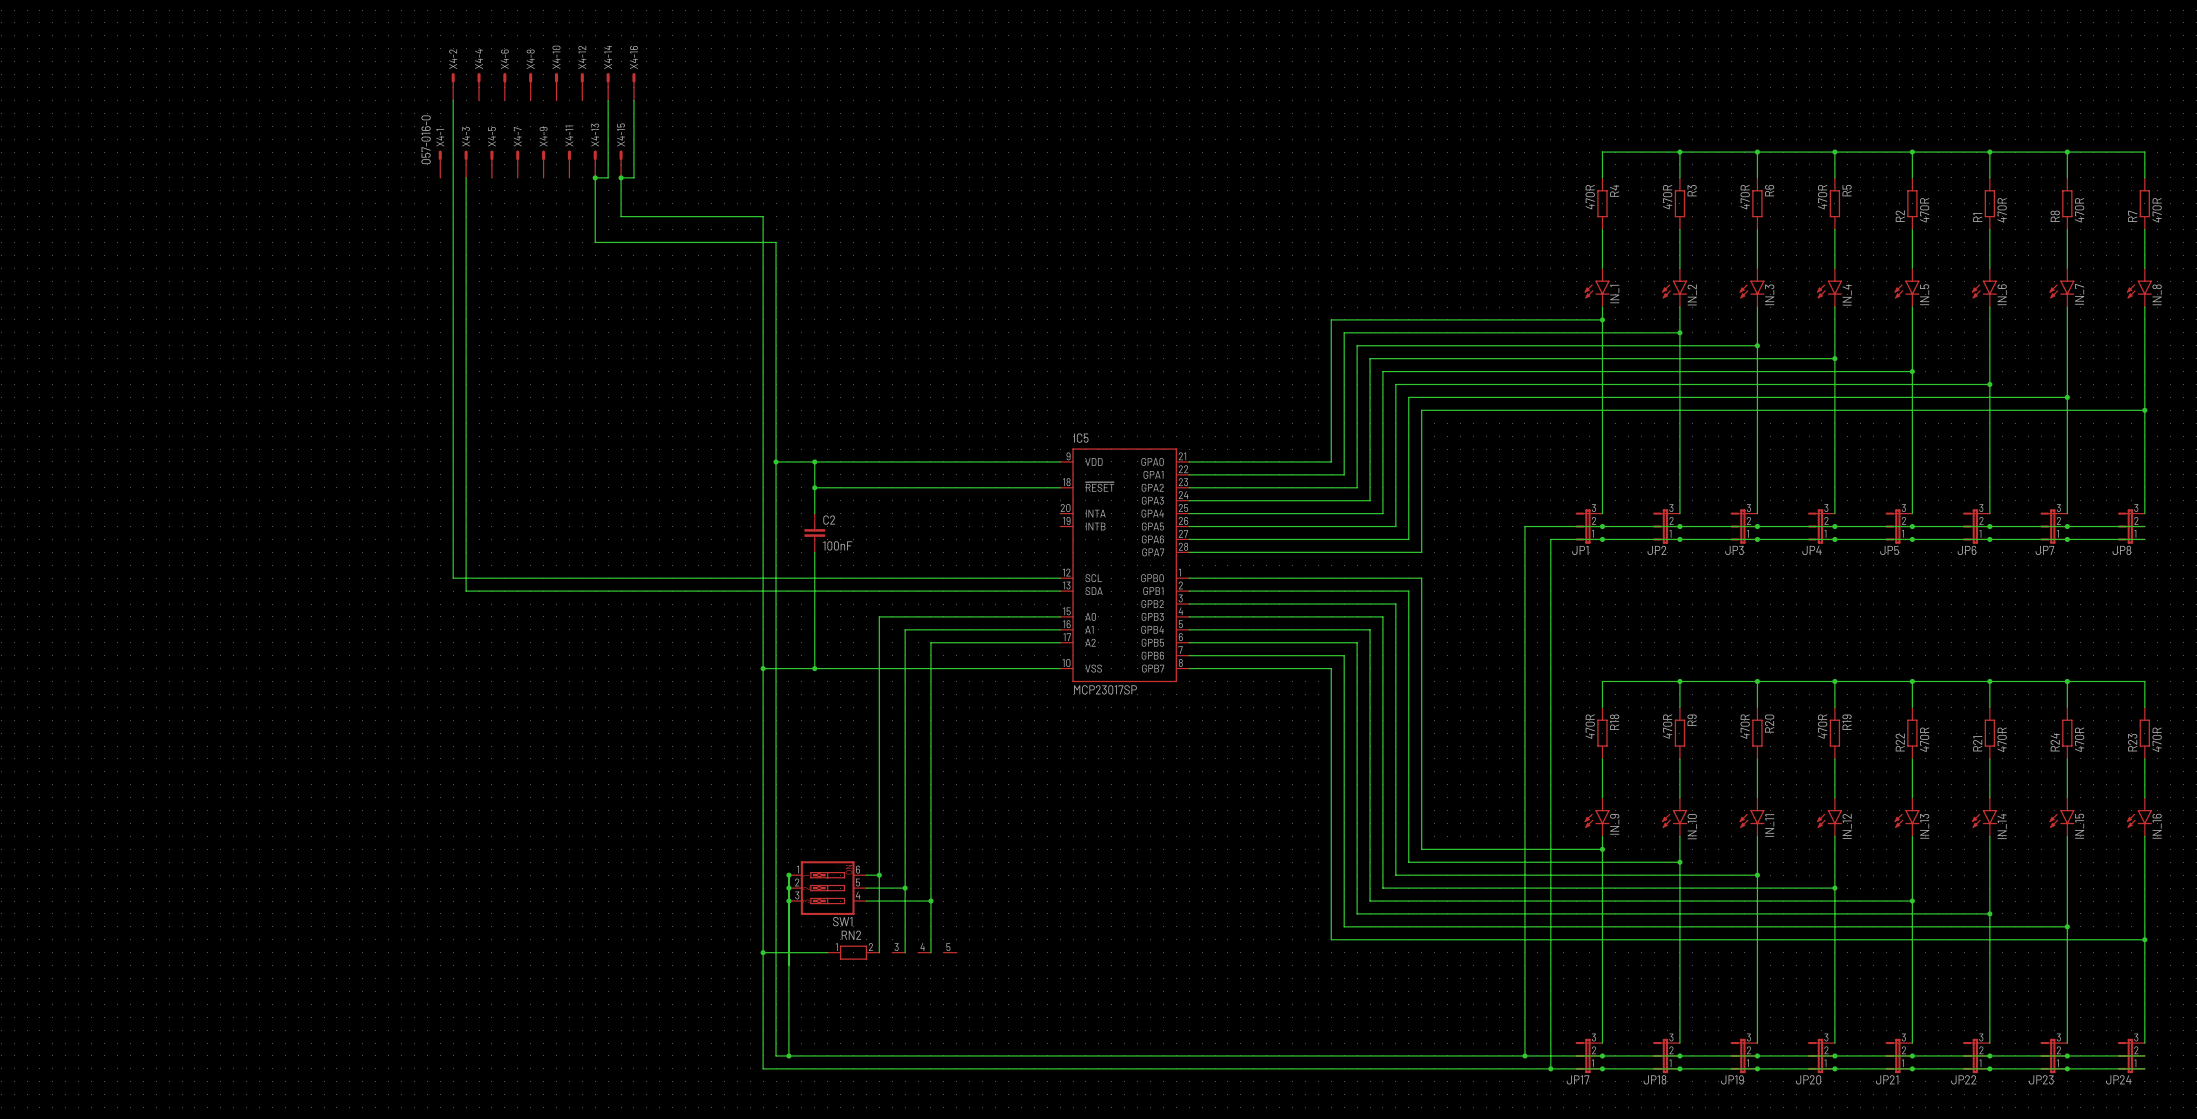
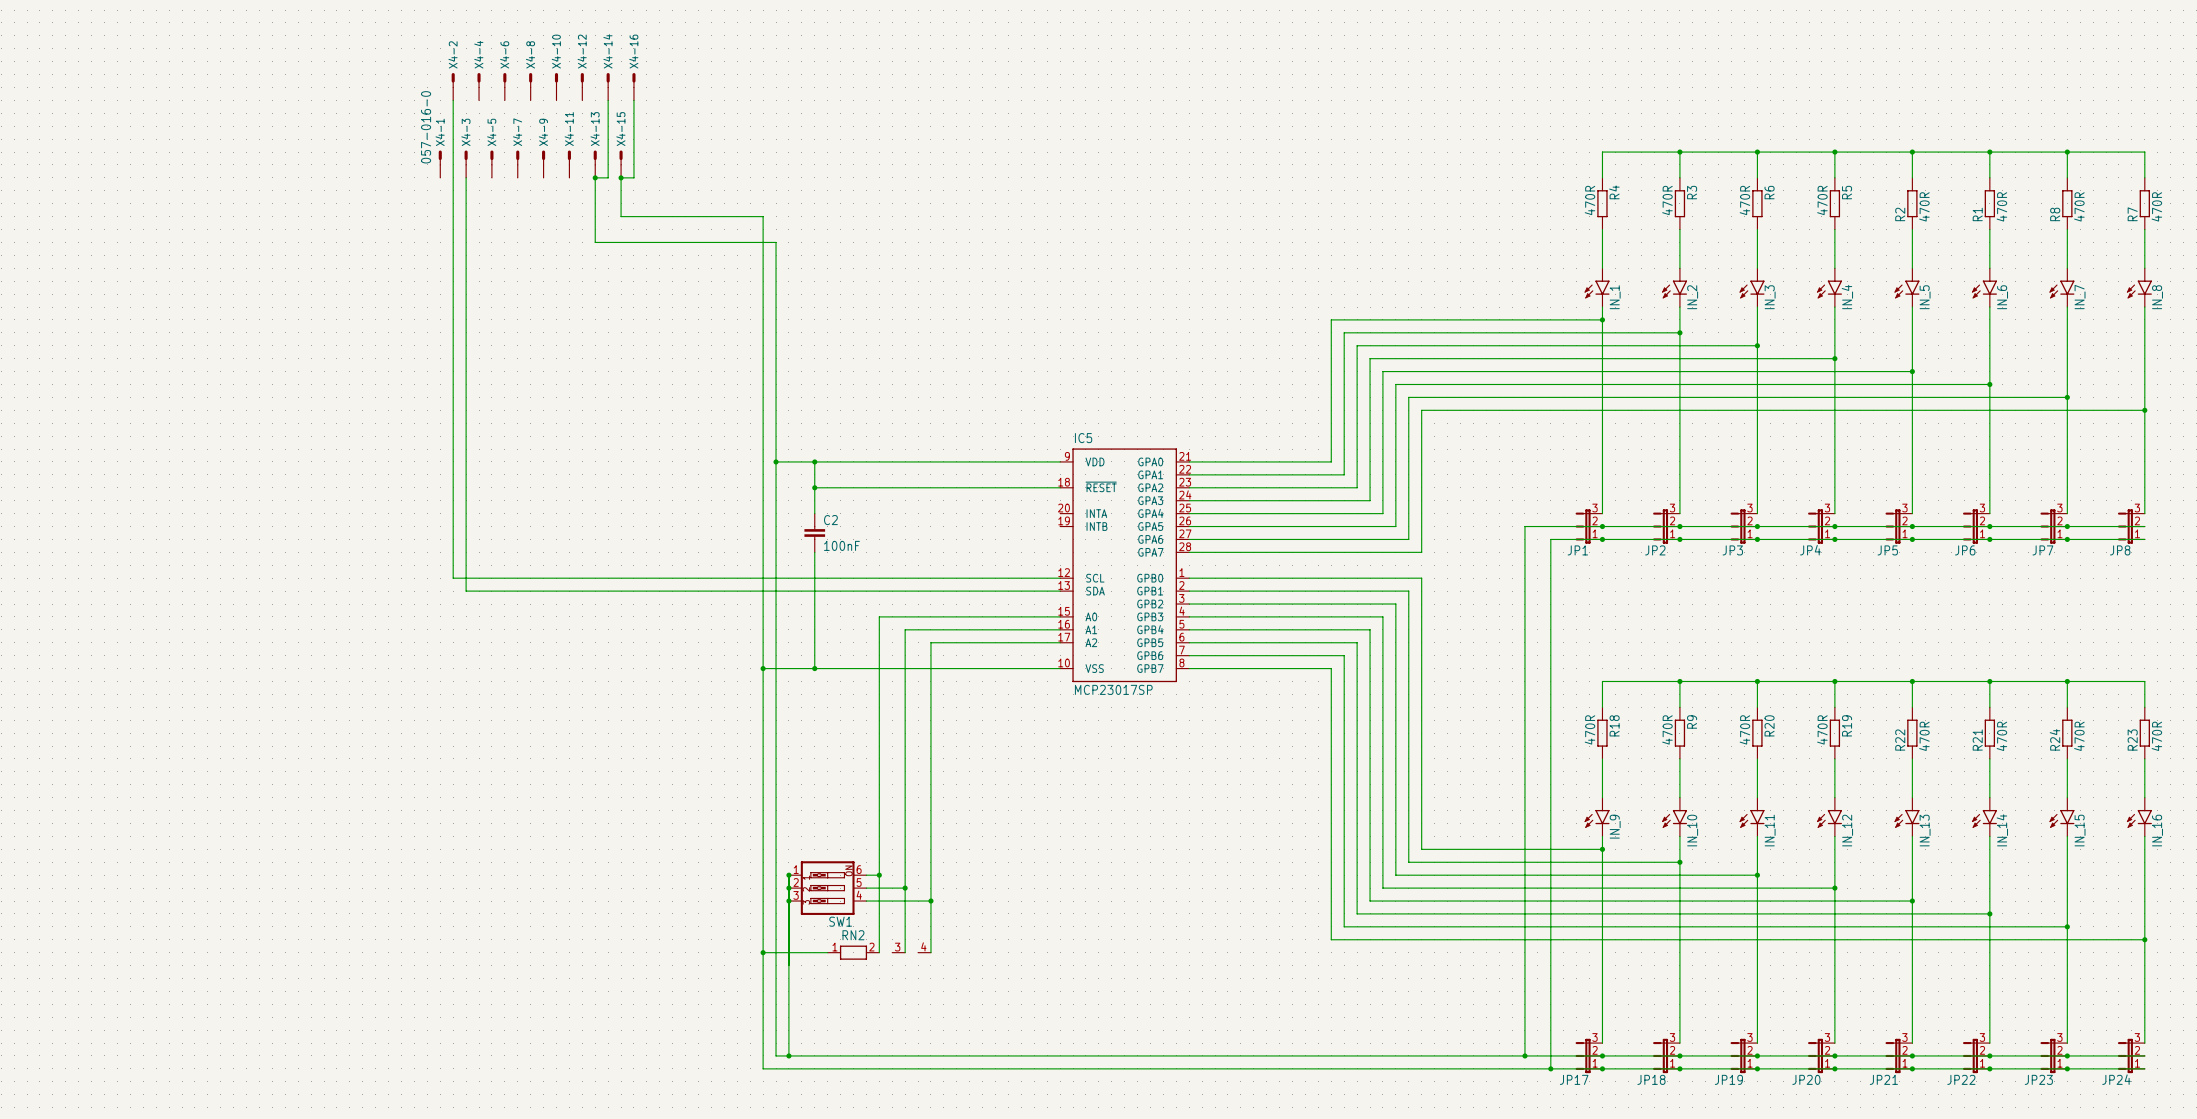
RN2 symbol: [827, 945, 957, 960] -> [827, 945, 931, 960]

